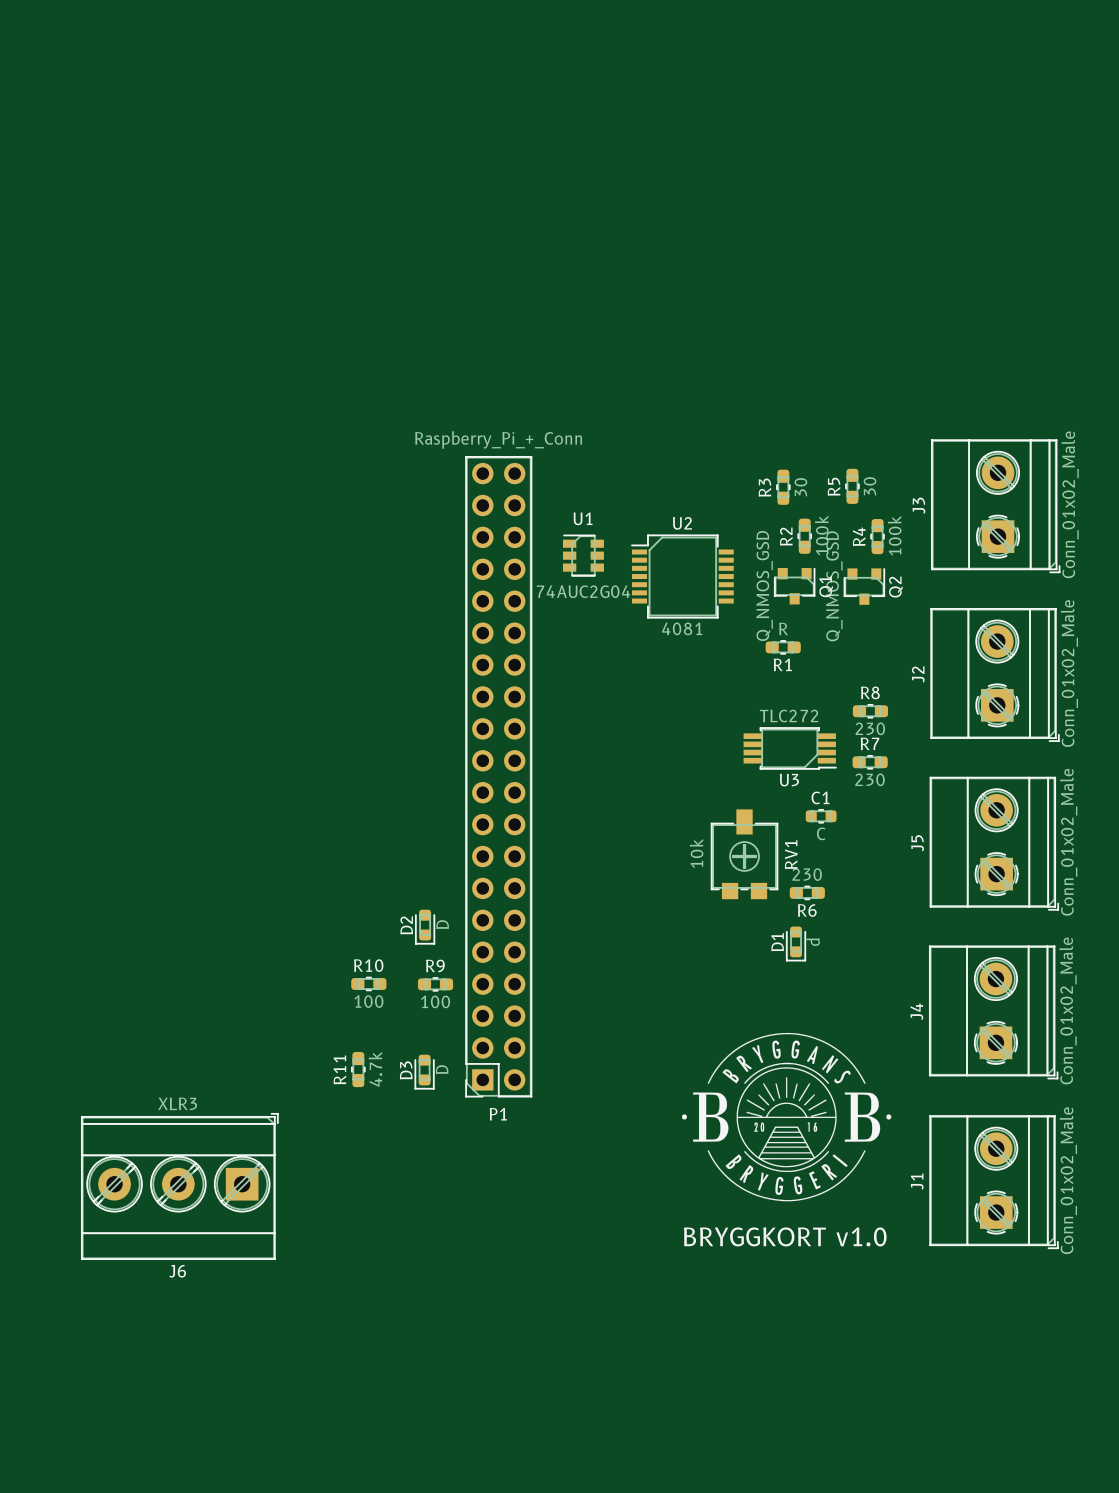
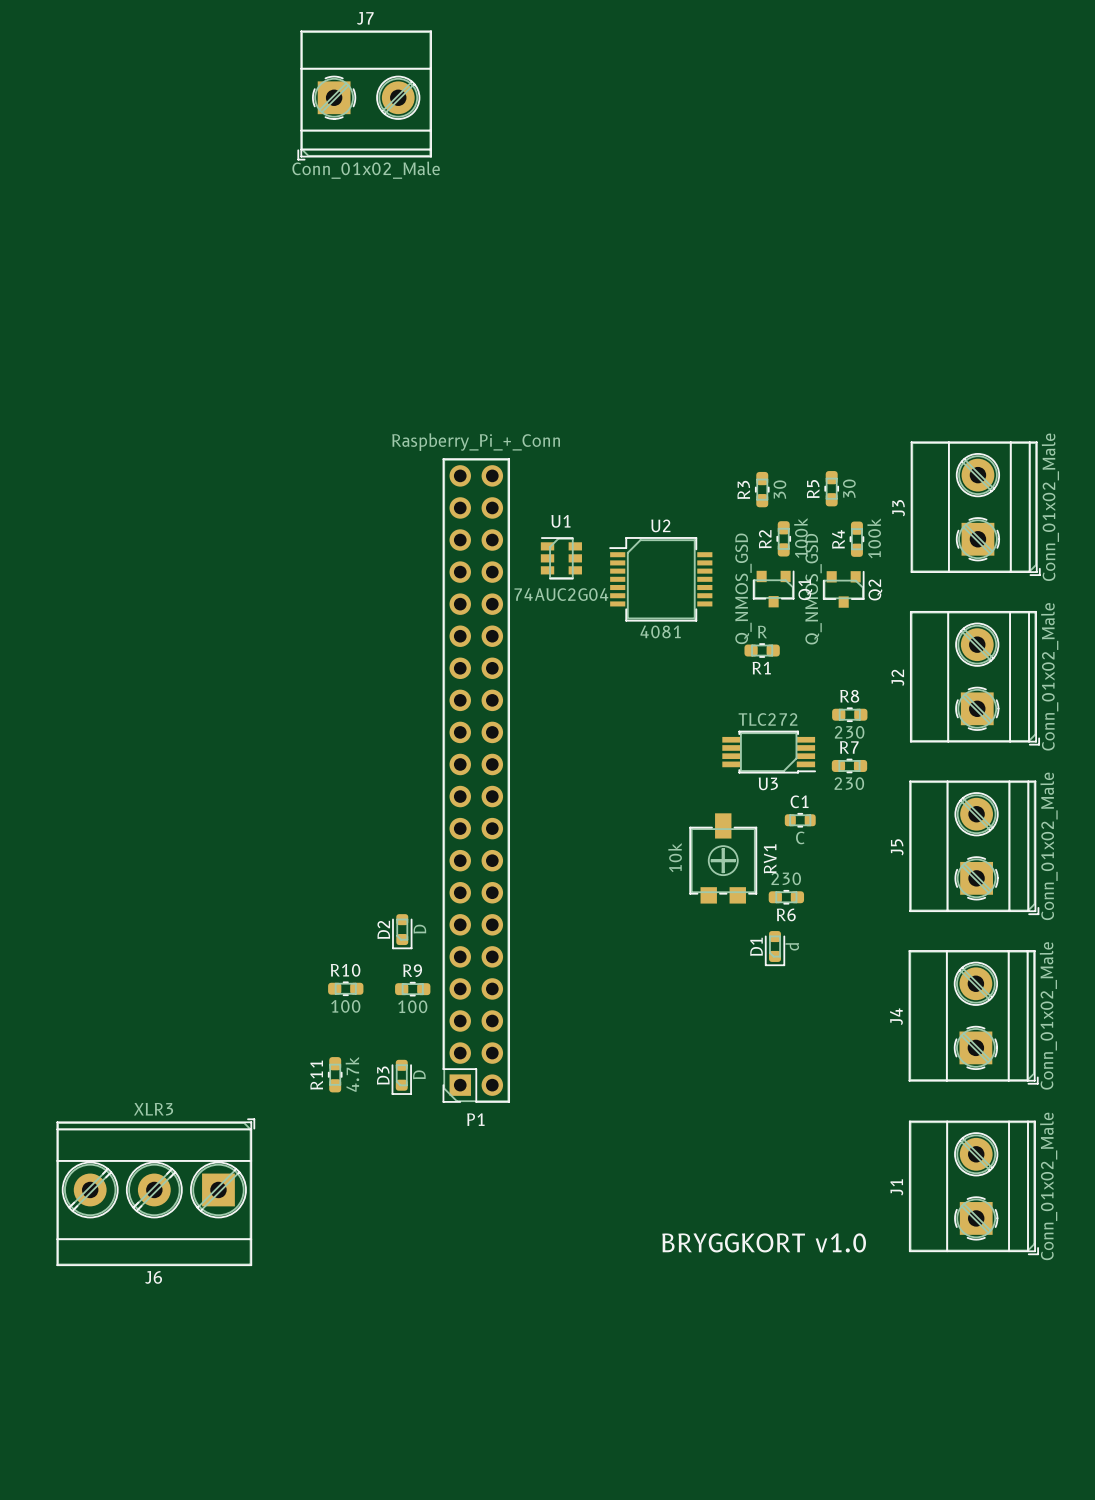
J7: none -> Conn_01x02_Male (364, 95)
drawing: [681, 1032, 892, 1202] -> none

